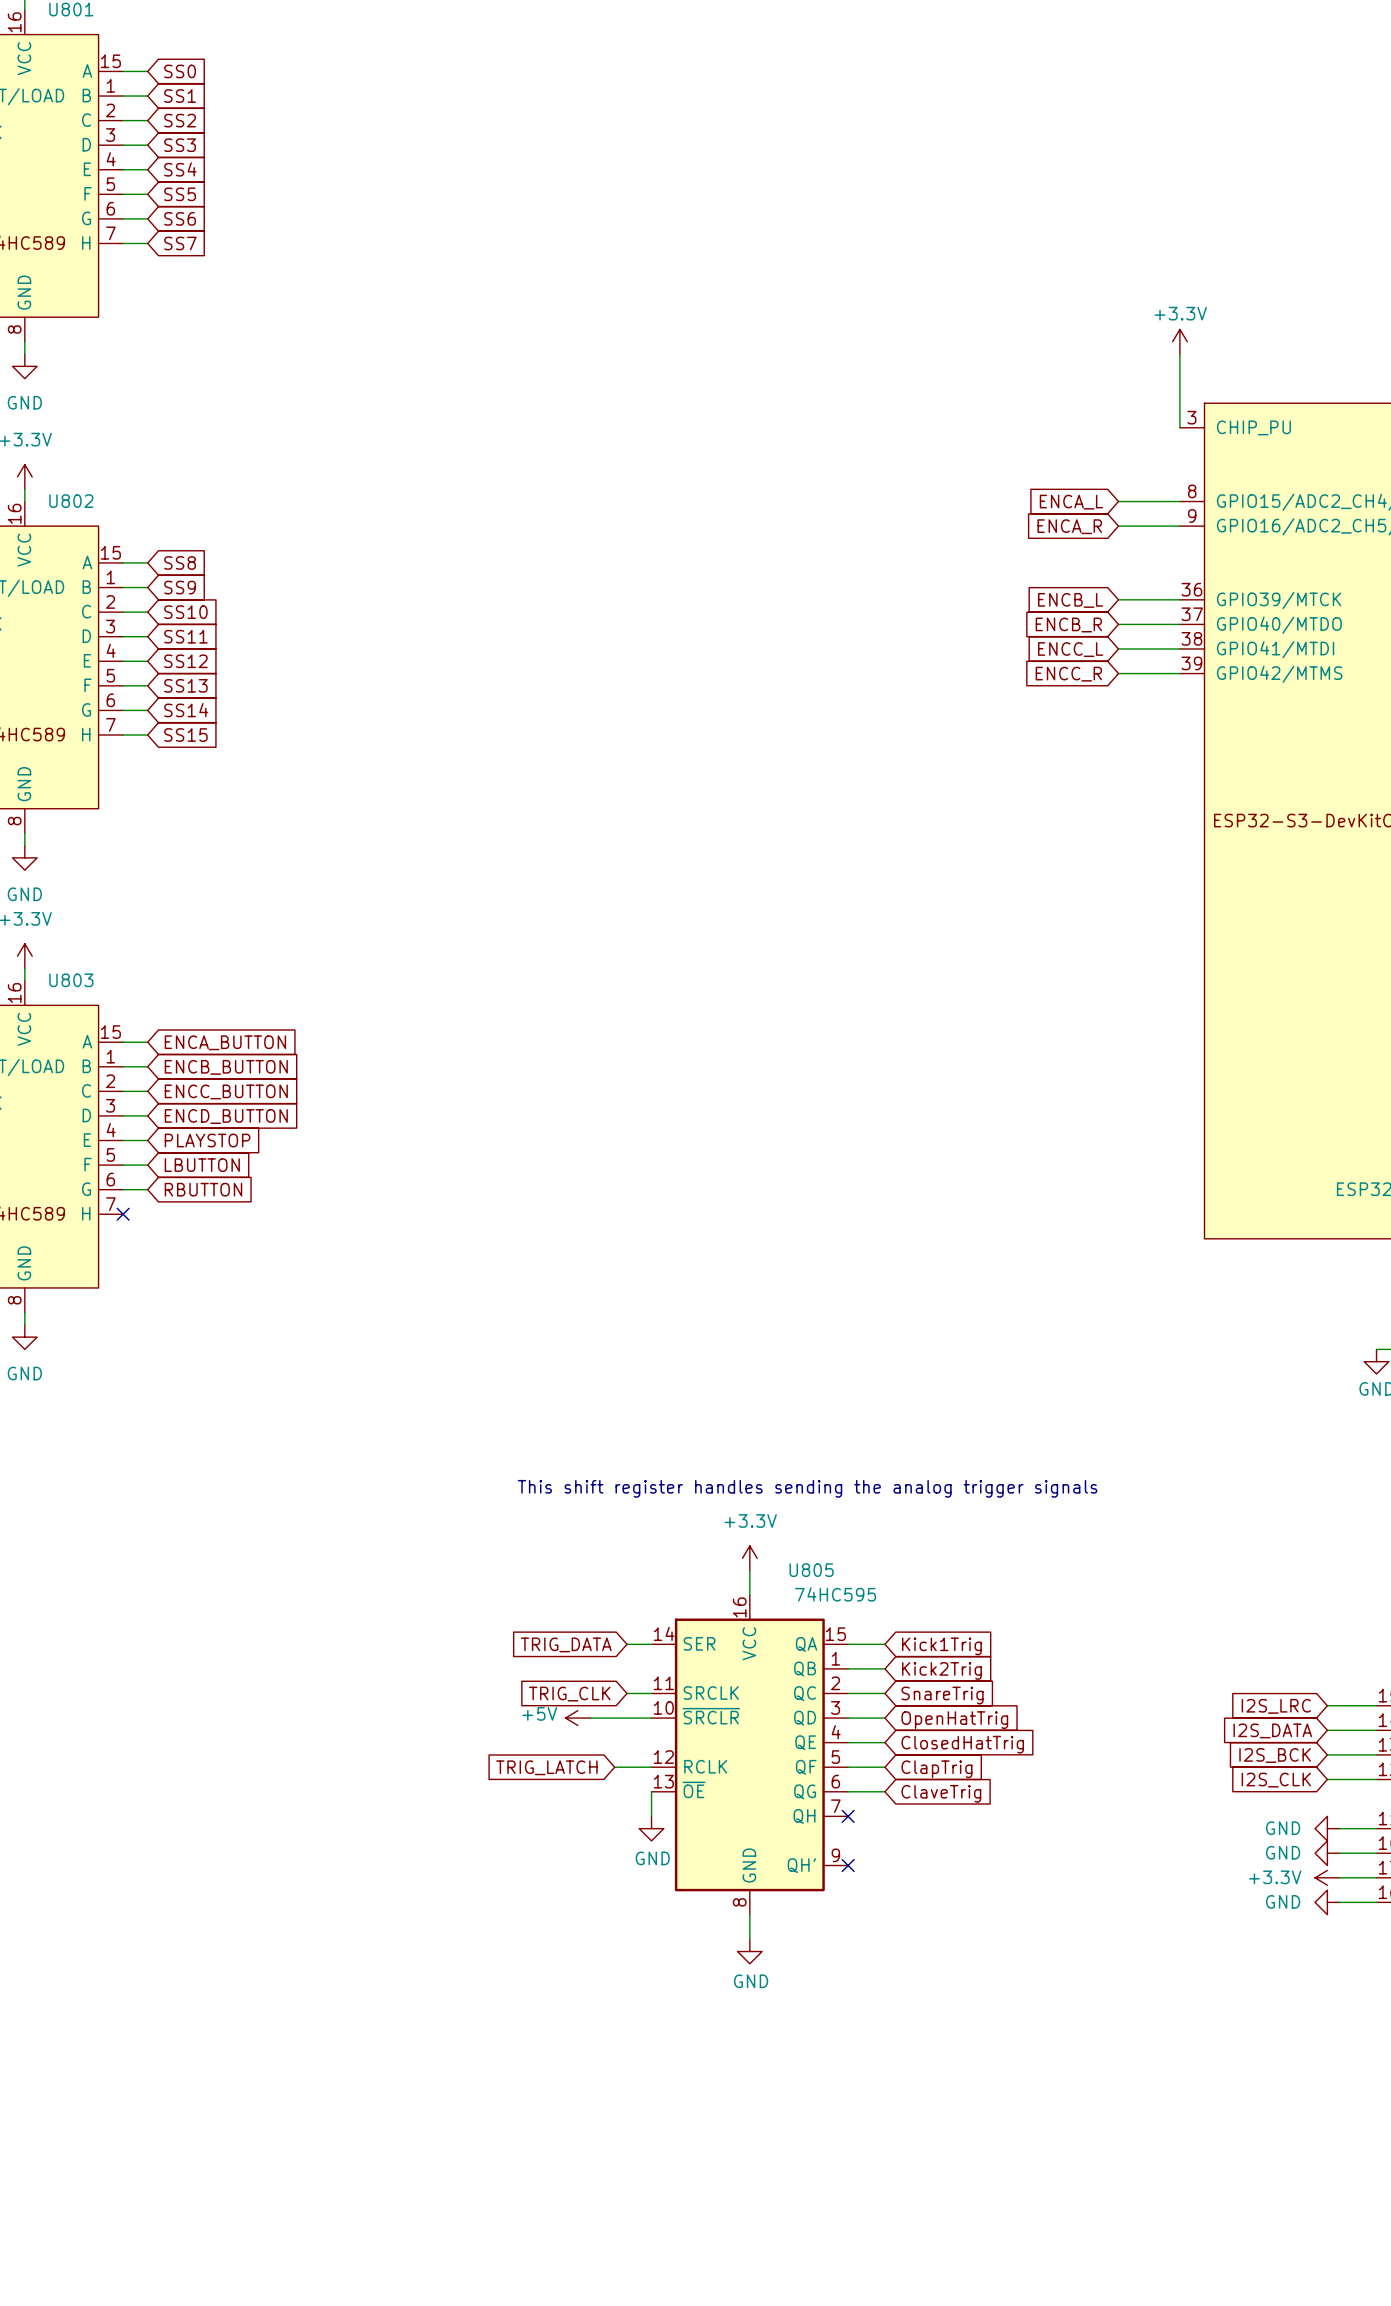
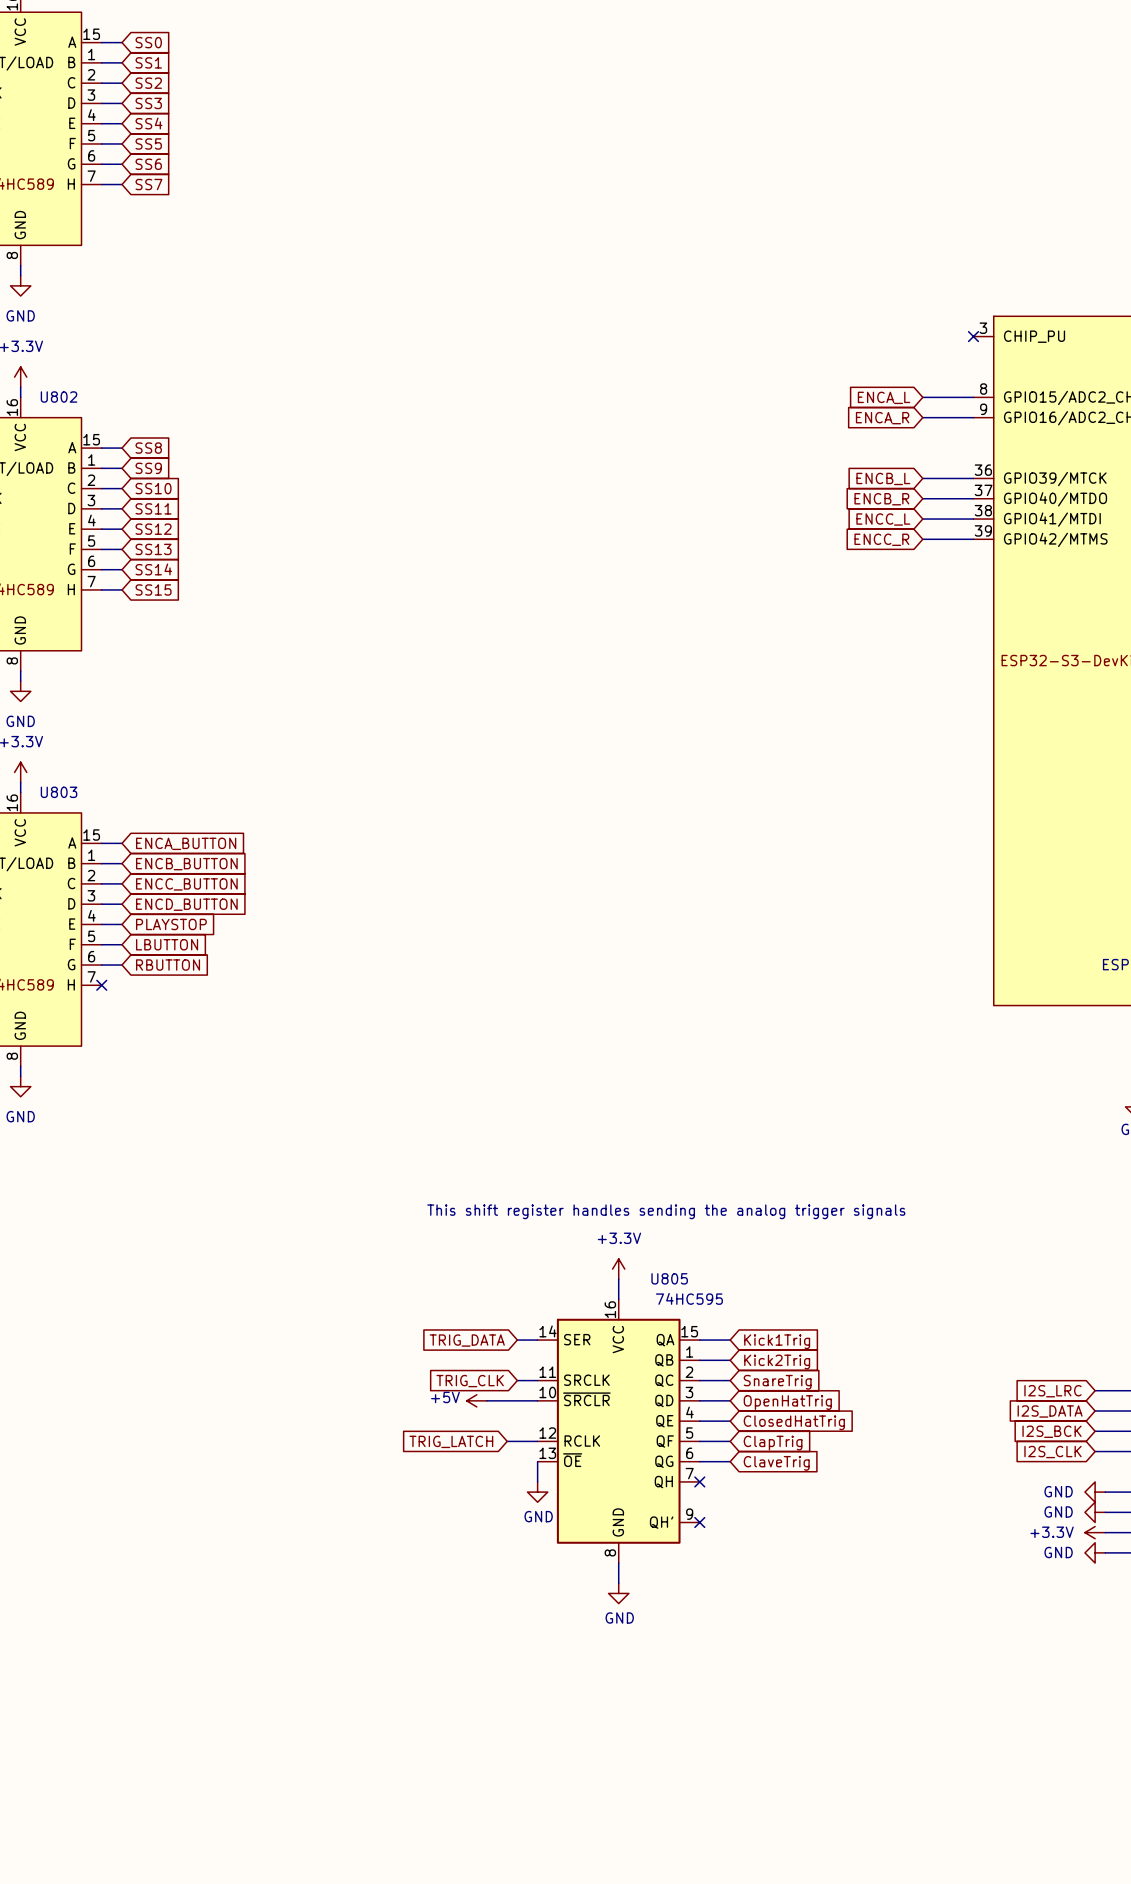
power symbol: +3.3V (1179, 341) -> none
wire: (1179, 354) (1179, 427) -> none
no-connect mark: none -> (973, 336)

